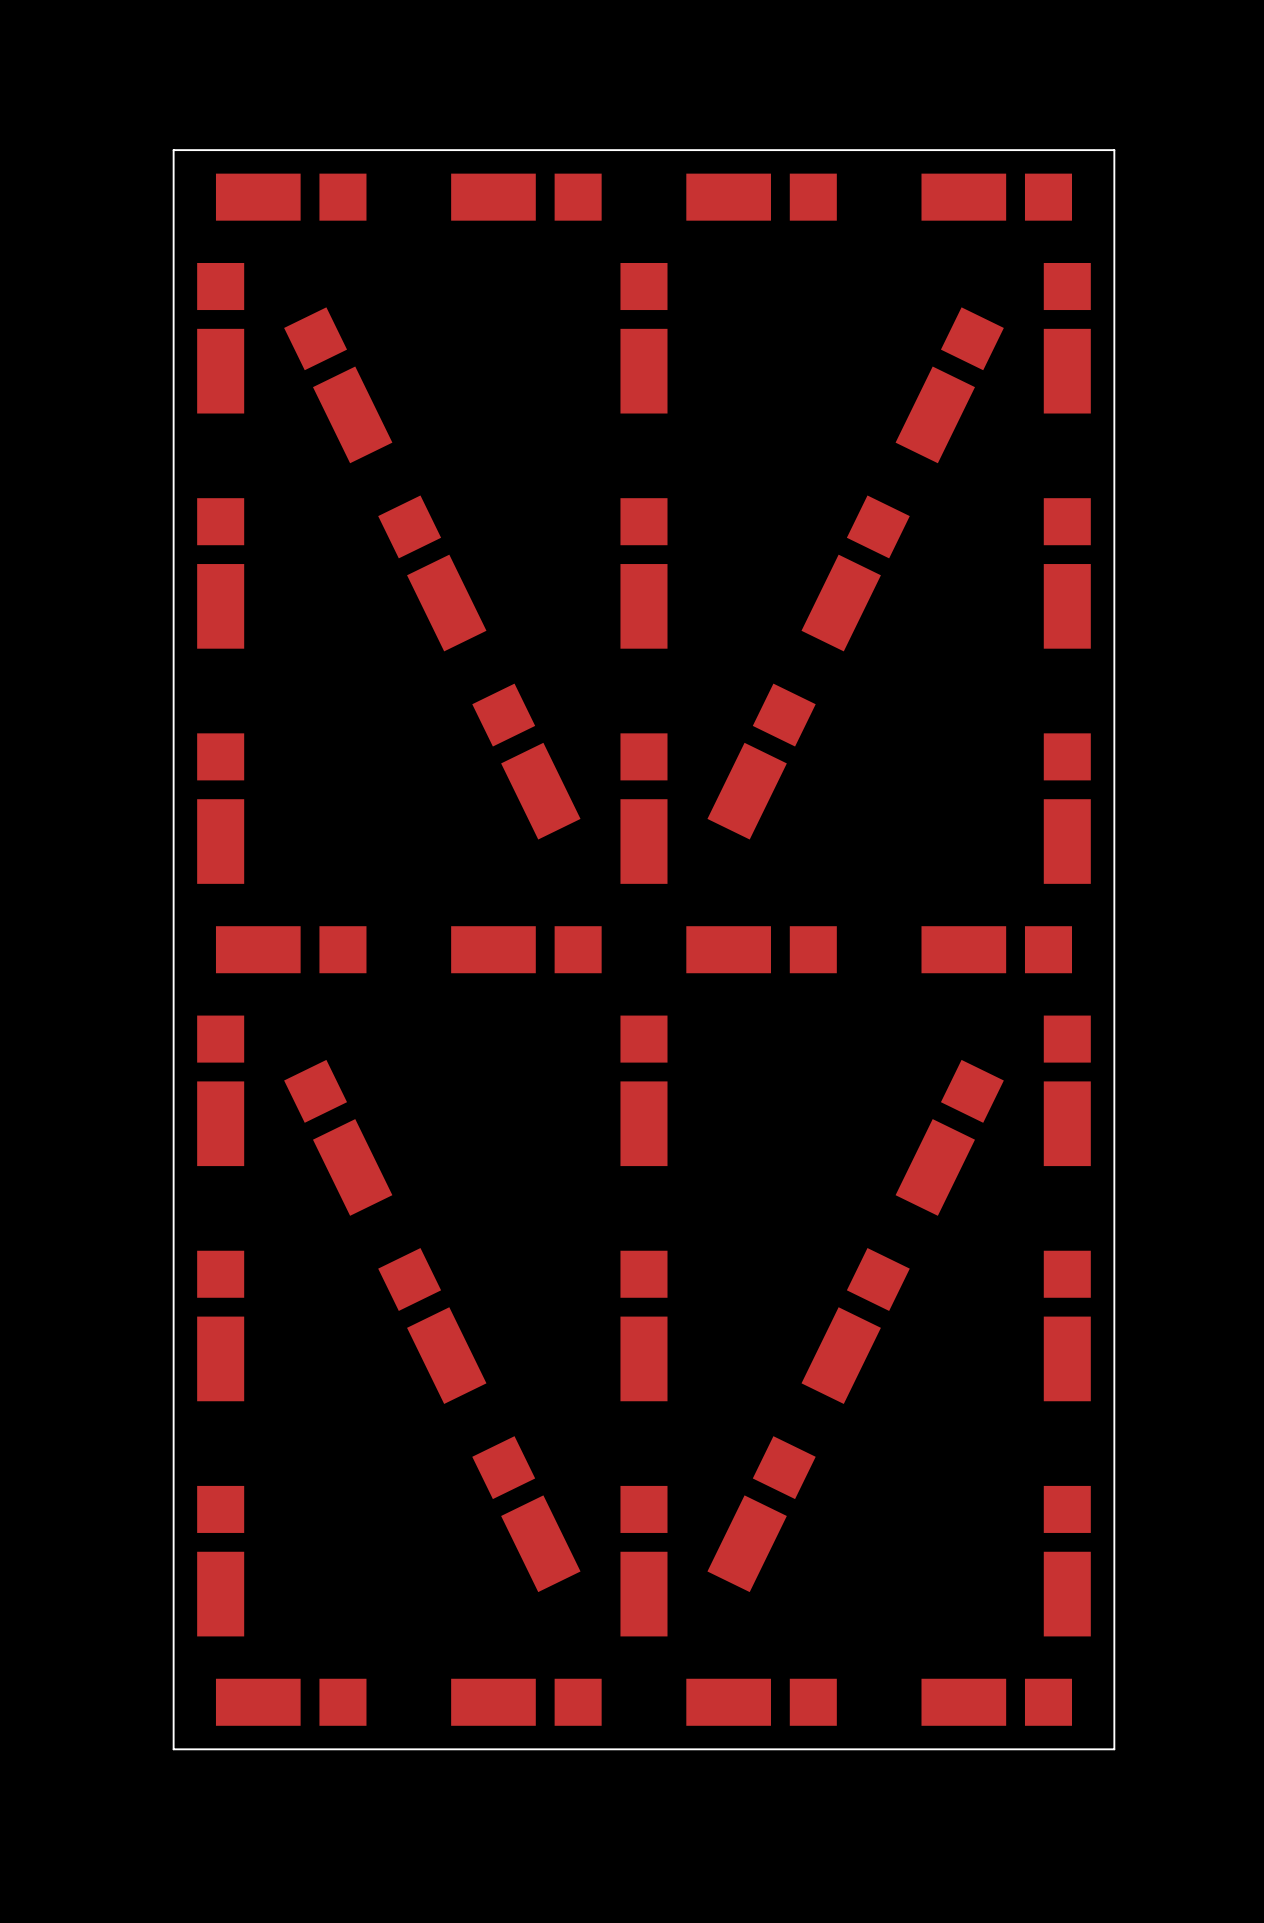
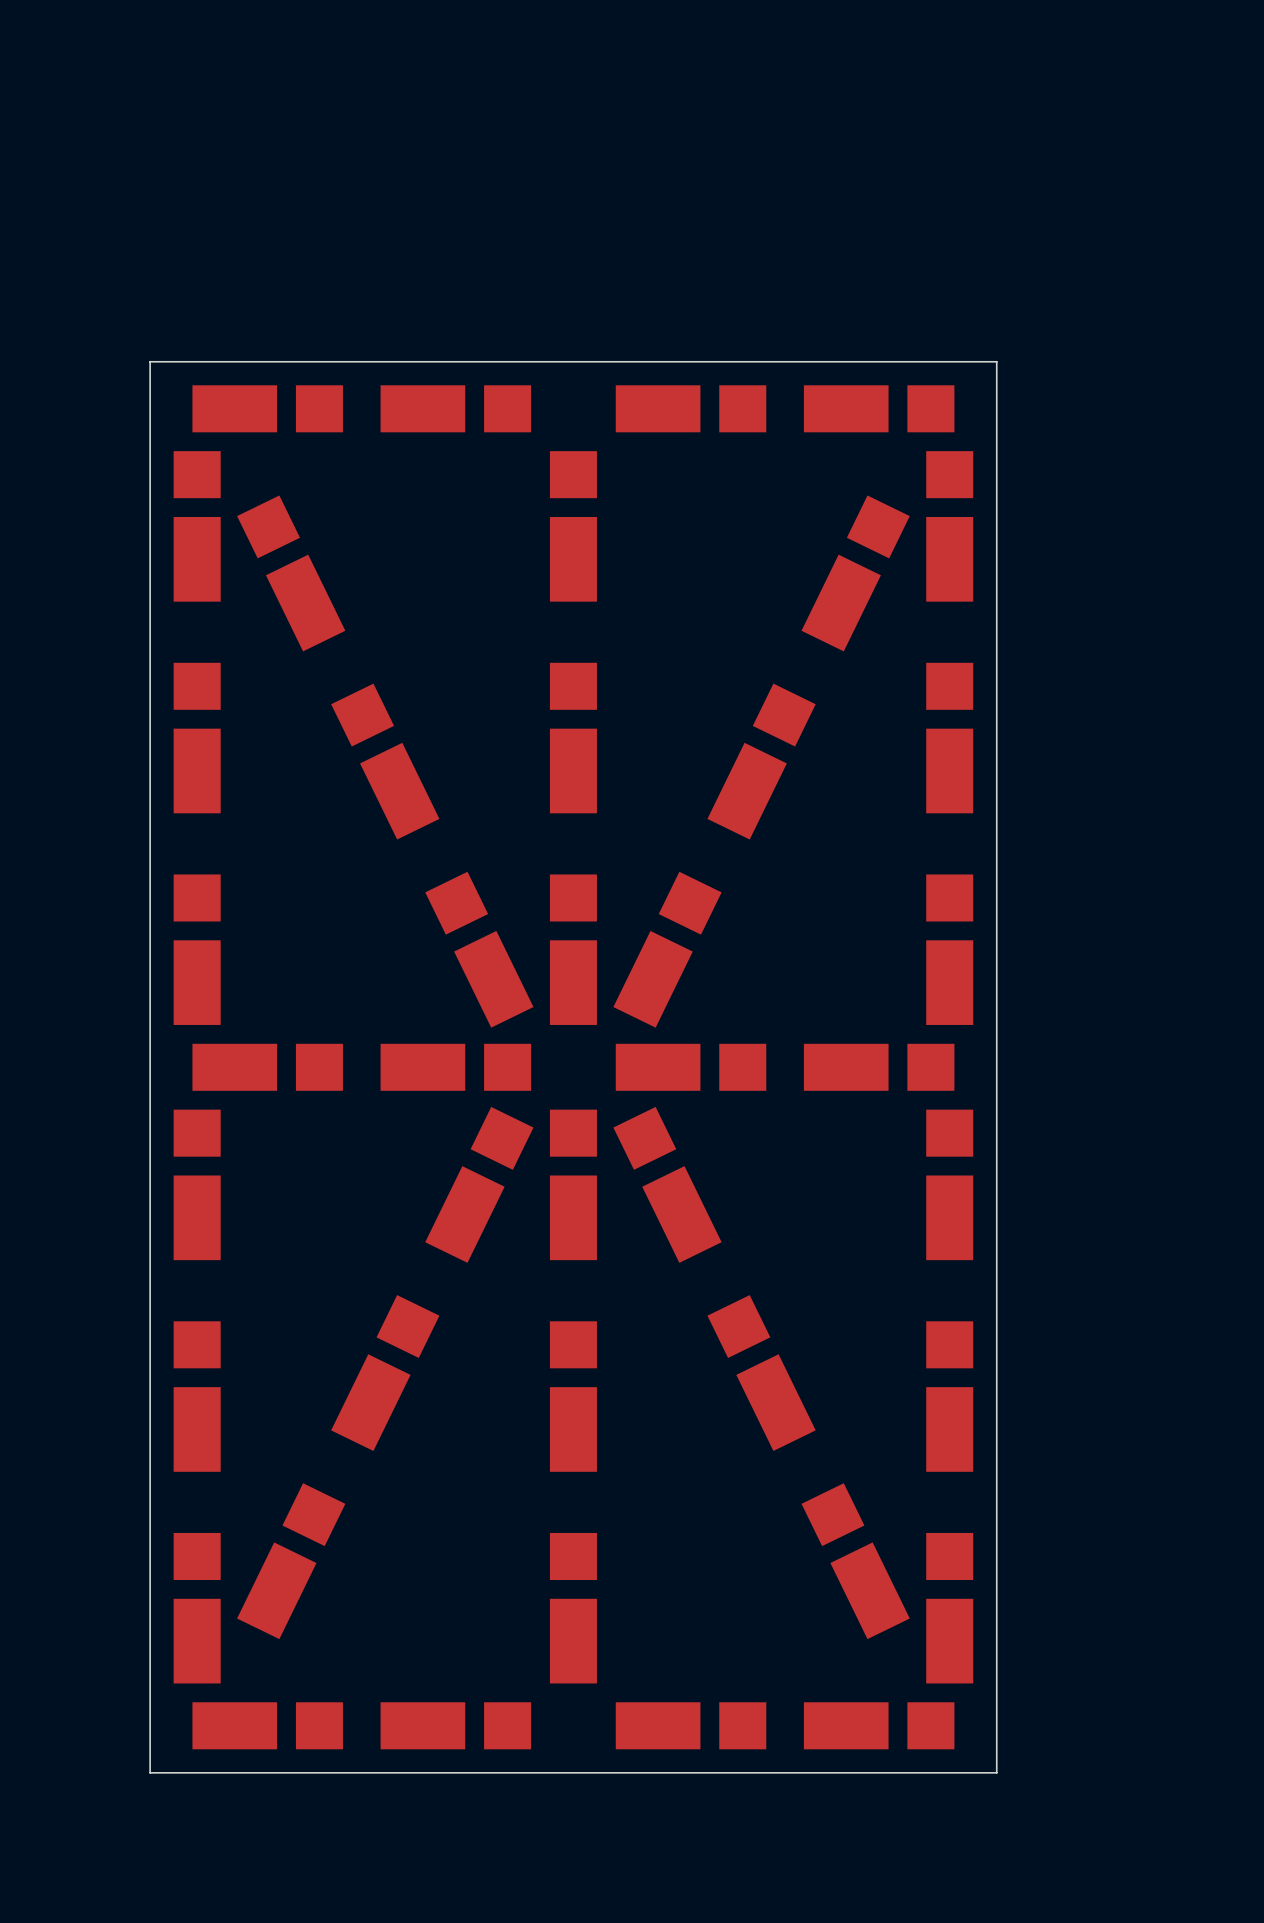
board edge: (173, 150) (1114, 150) (1114, 1749) (173, 1749) (173, 150) -> (150, 361) (150, 1772) (996, 1772) (996, 361) (150, 361)
part: (291, 197) -> none
part: (526, 197) -> none
part: (761, 197) -> none
part: (996, 197) -> none
part rotation: 0° (220, 338) -> 90° clockwise (267, 408)
part rotation: 0° (643, 338) -> 90° clockwise (691, 408)
part: (1067, 338) -> none
part: (338, 385) -> none
part: (949, 385) -> none
part: none -> (455, 408)
part: none -> (879, 408)
part: none -> (949, 526)
part position: (220, 573) -> (197, 526)
part: none -> (291, 573)
part: (432, 573) -> none
part position: (643, 573) -> (573, 526)
part: (1067, 573) -> none
part: none -> (197, 738)
part: none -> (573, 738)
part: none -> (949, 738)
part: none -> (385, 761)
part: (526, 761) -> none
part: (220, 808) -> none
part: (643, 808) -> none
part: (1067, 808) -> none
part: none -> (197, 949)
part: (291, 949) -> none
part: none -> (479, 949)
part rotation: 0° (526, 949) -> 90° counterclockwise (573, 949)
part: none -> (667, 949)
part: (761, 949) -> none
part rotation: 0° (996, 949) -> 90° counterclockwise (949, 949)
part: none -> (267, 1067)
part: none -> (455, 1067)
part: none -> (879, 1067)
part: (220, 1090) -> none
part rotation: 0° (643, 1090) -> 90° clockwise (691, 1067)
part: (1067, 1090) -> none
part: (338, 1137) -> none
part rotation: 0° (949, 1137) -> 26° counterclockwise (949, 1184)
part: none -> (197, 1184)
part: none -> (479, 1184)
part: none -> (573, 1184)
part: none -> (667, 1184)
part: (220, 1326) -> none
part: (432, 1326) -> none
part: (643, 1326) -> none
part: (855, 1326) -> none
part: (1067, 1326) -> none
part: none -> (385, 1373)
part: none -> (761, 1373)
part: none -> (197, 1396)
part: none -> (573, 1396)
part: none -> (949, 1396)
part: (526, 1514) -> none
part: (761, 1514) -> none
part position: (220, 1561) -> (197, 1608)
part: none -> (291, 1561)
part: (643, 1561) -> none
part: none -> (855, 1561)
part: (1067, 1561) -> none
part: none -> (573, 1608)
part: none -> (949, 1608)
part position: (291, 1702) -> (267, 1725)
part: (526, 1702) -> none
part: (761, 1702) -> none
part: (996, 1702) -> none
part: none -> (455, 1725)
part: none -> (691, 1725)
part: none -> (879, 1725)

